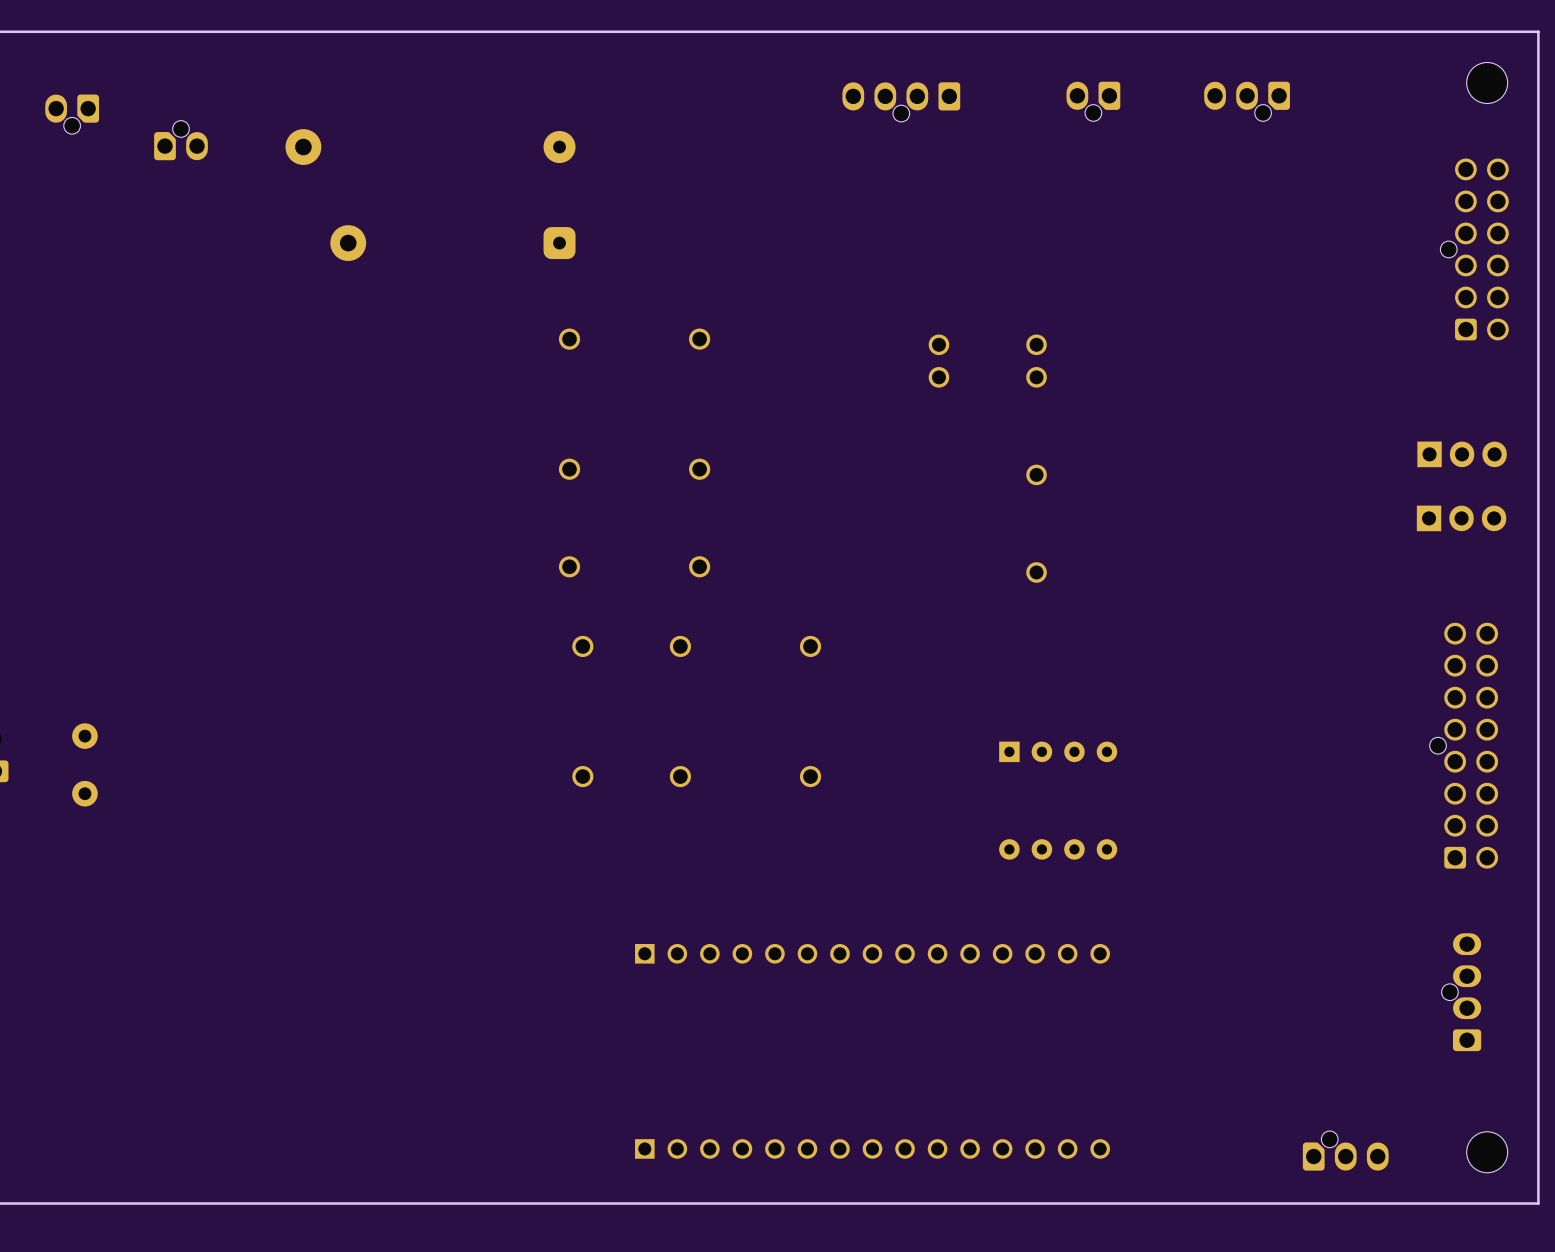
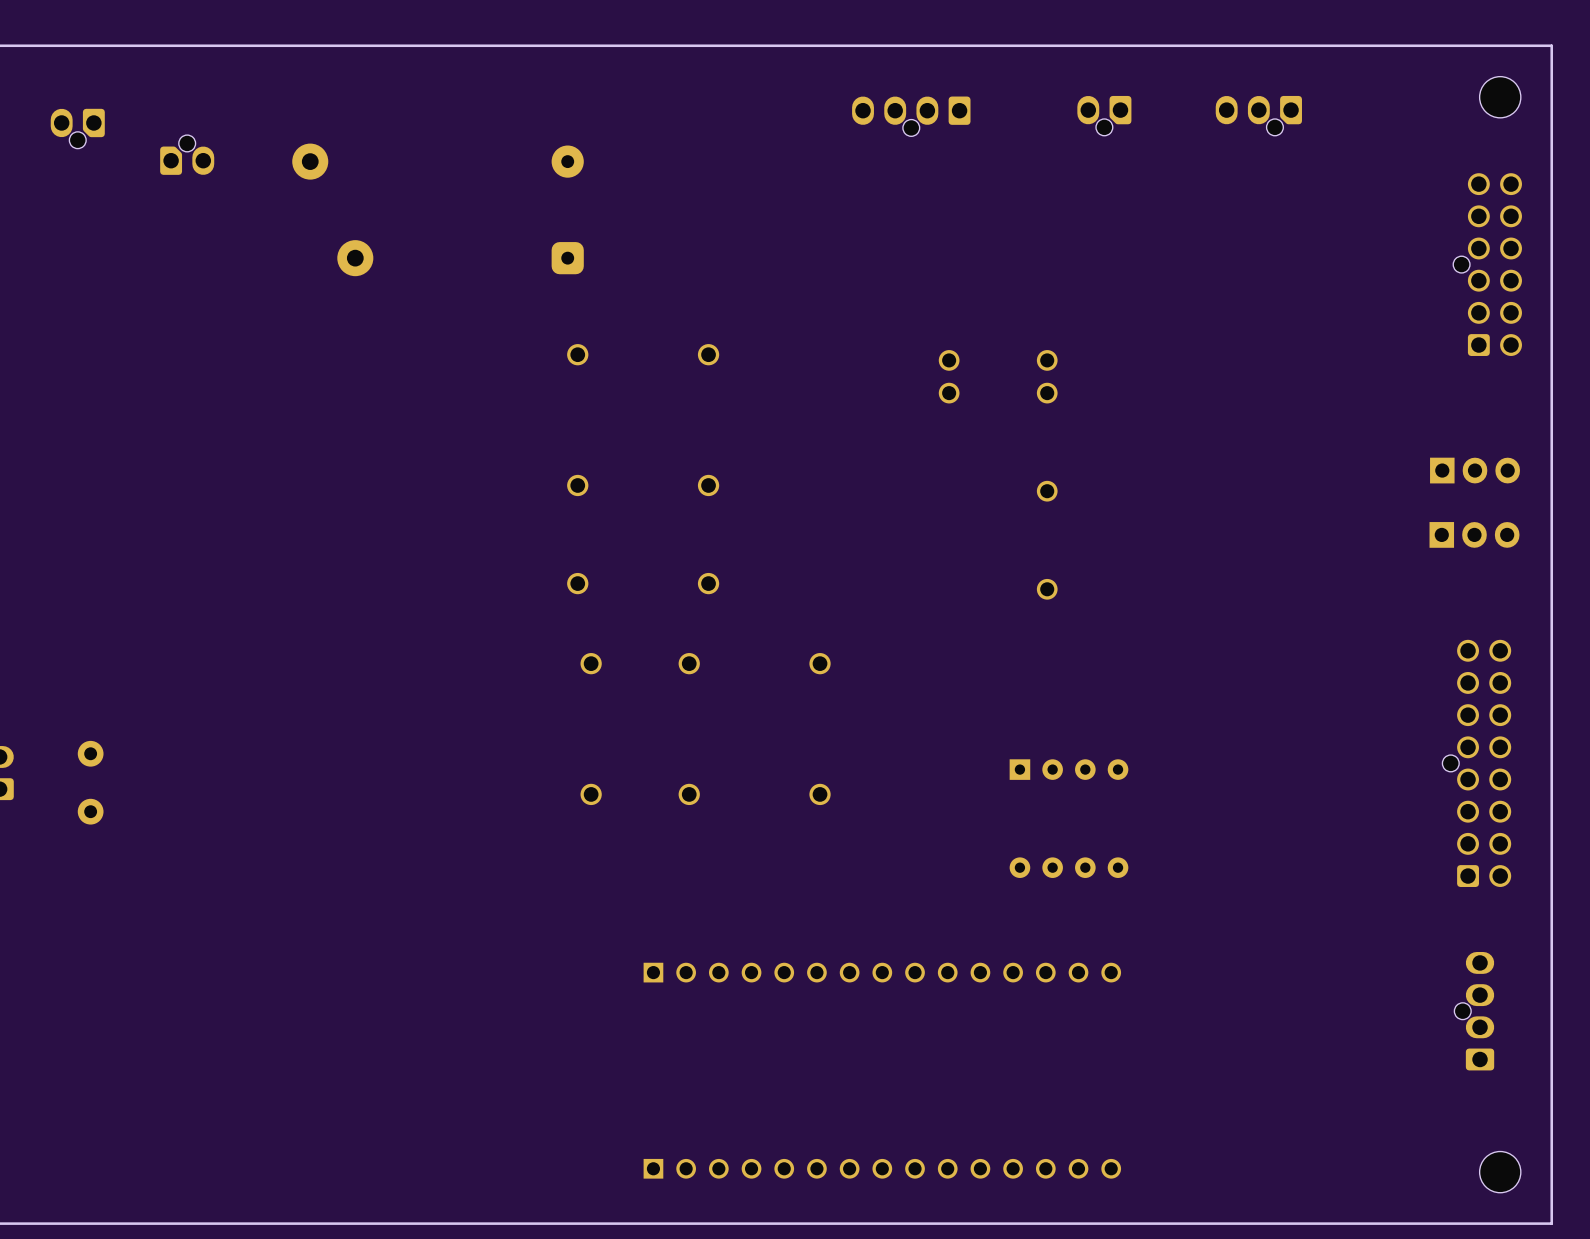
part: (1345, 1150) -> none

